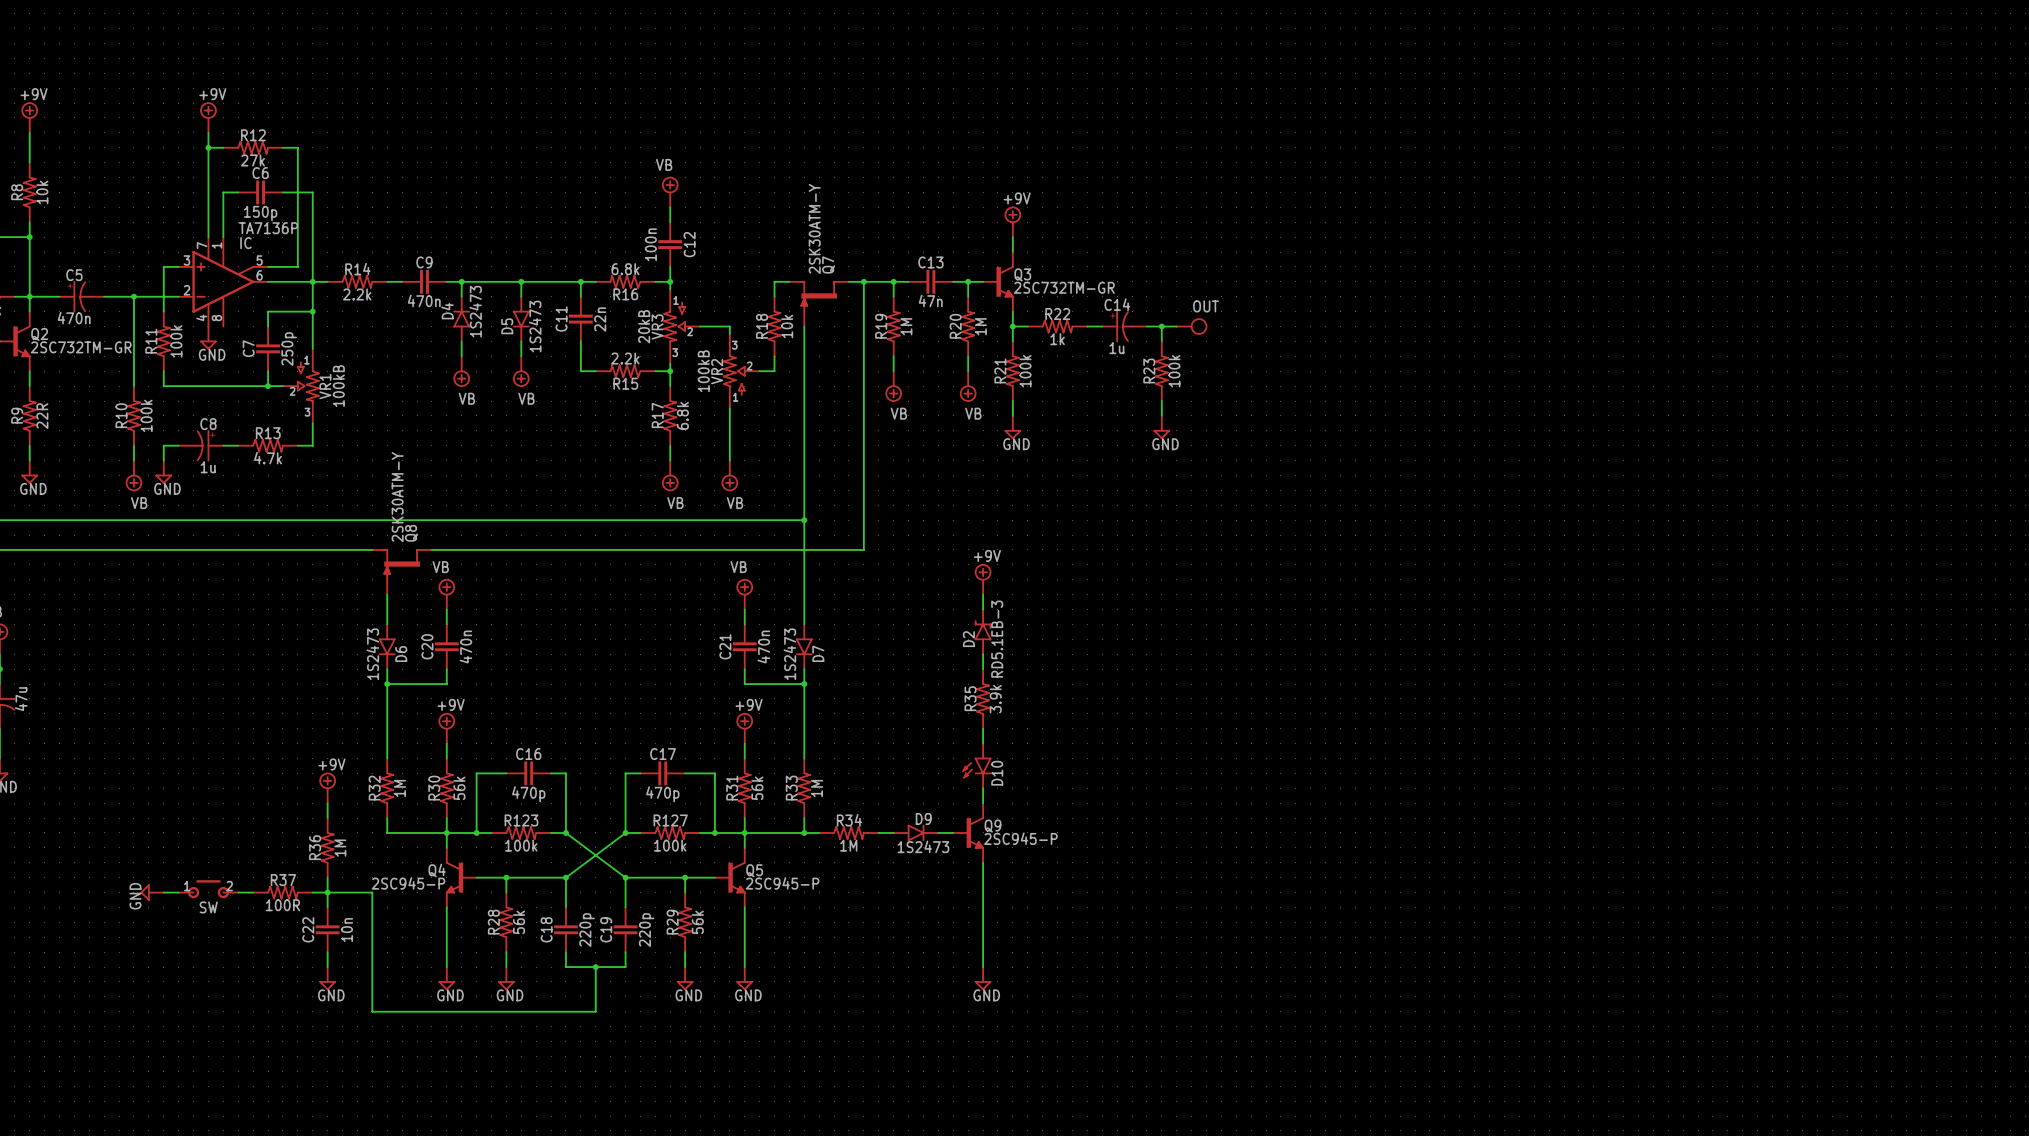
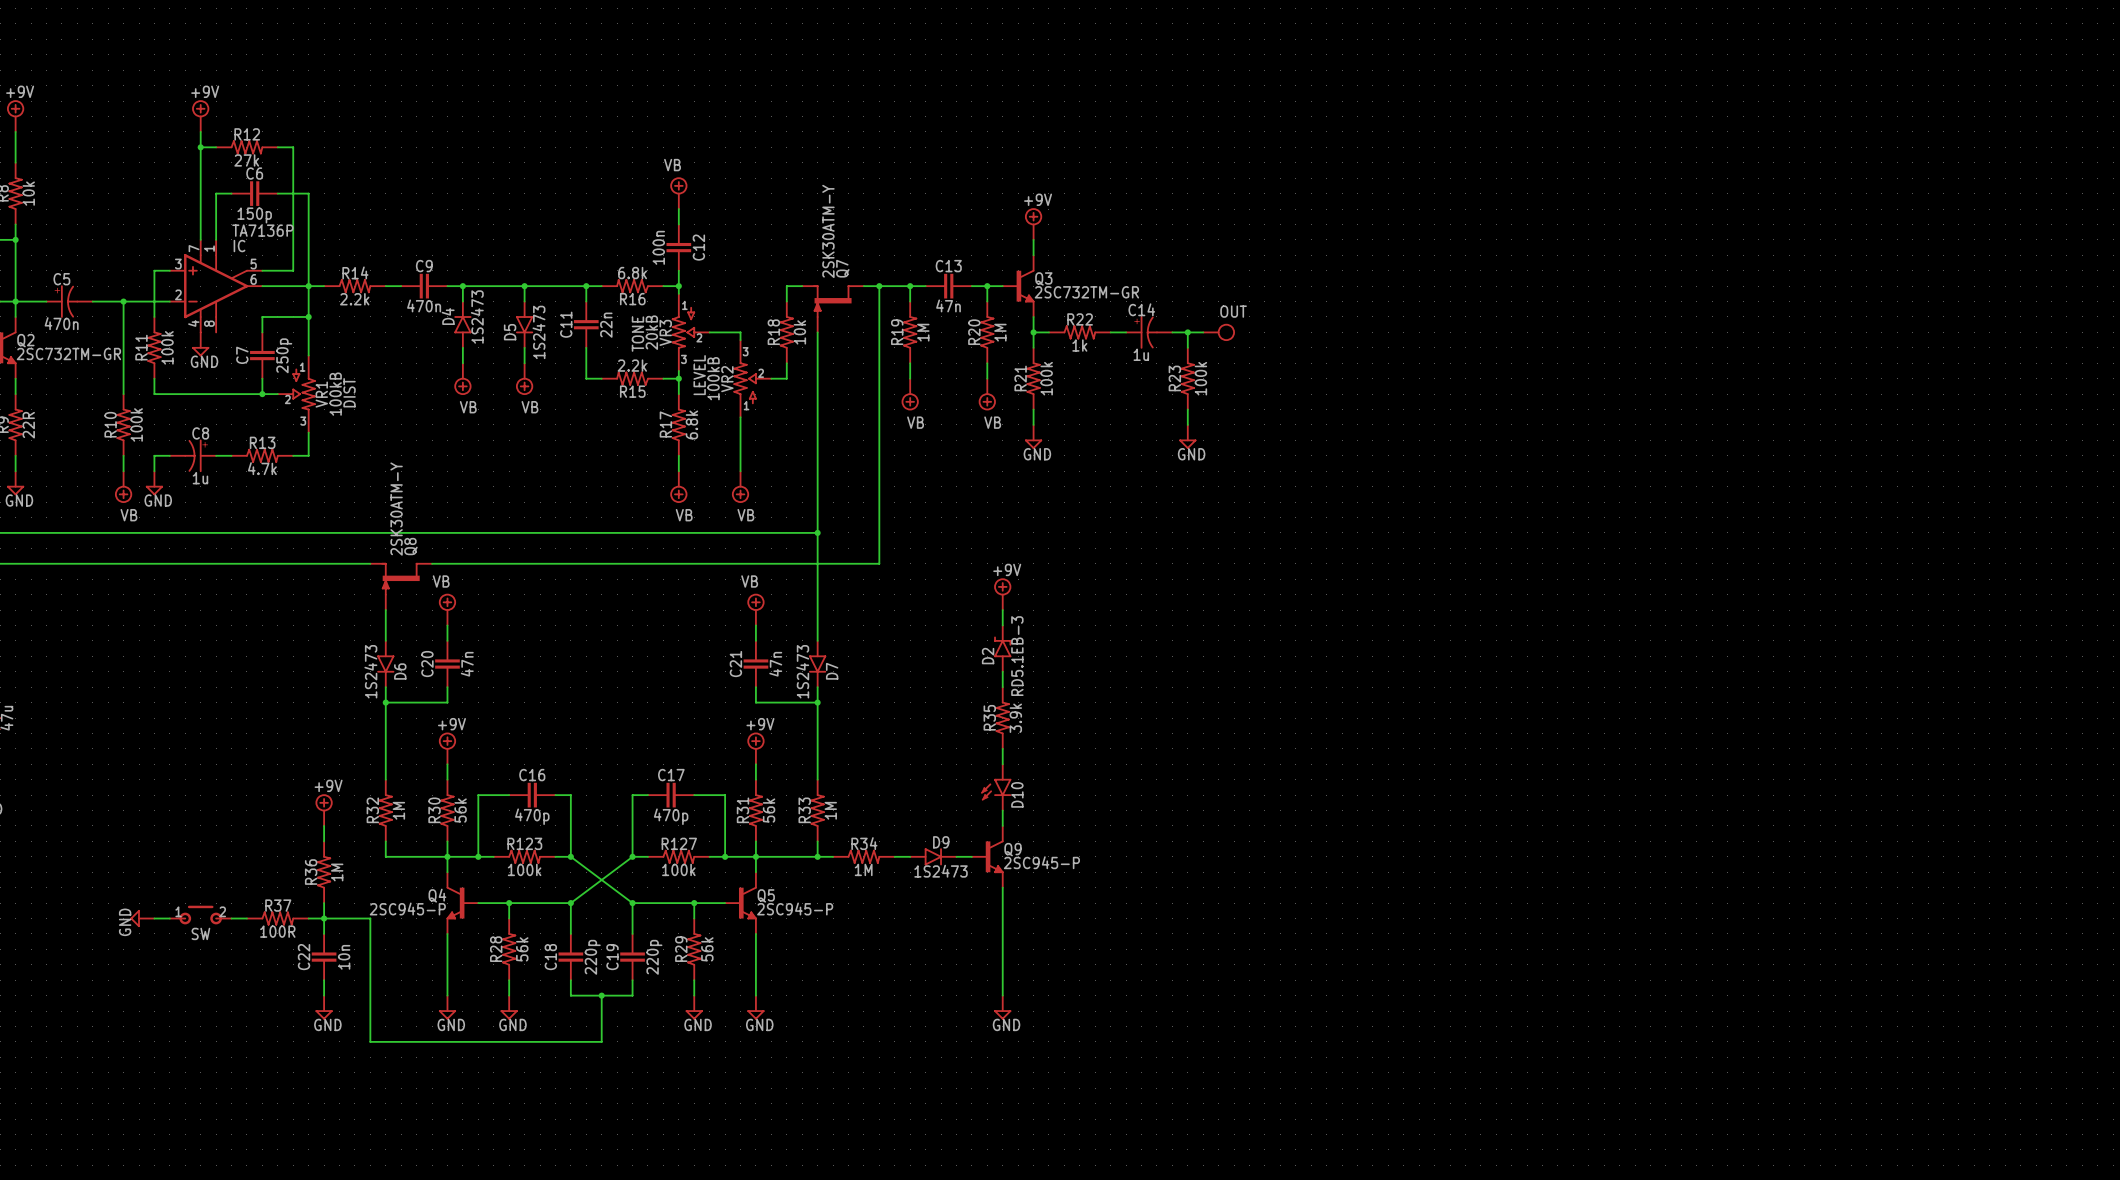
text: none -> TONE (637, 334)
text: none -> LEVEL (699, 375)
text: none -> DIST (349, 392)
C20 value: 470n (465, 647) -> 47n (467, 664)
C21 value: 470n (763, 647) -> 47n (775, 664)

